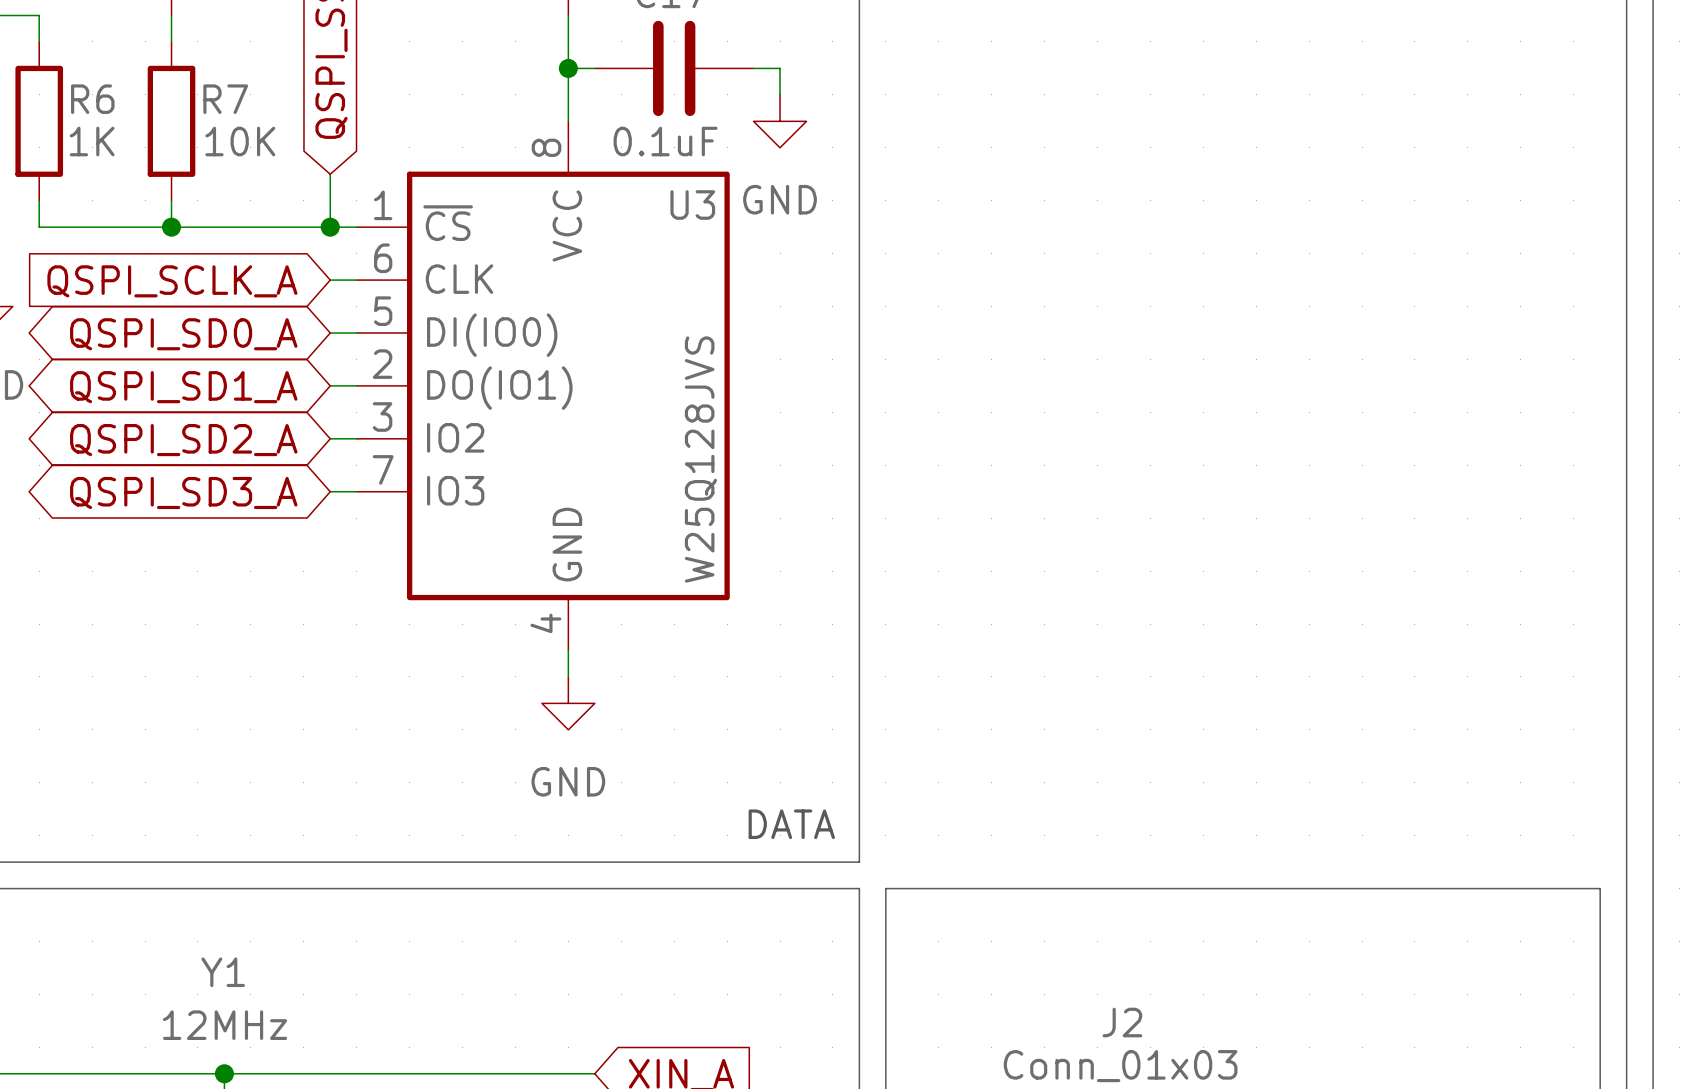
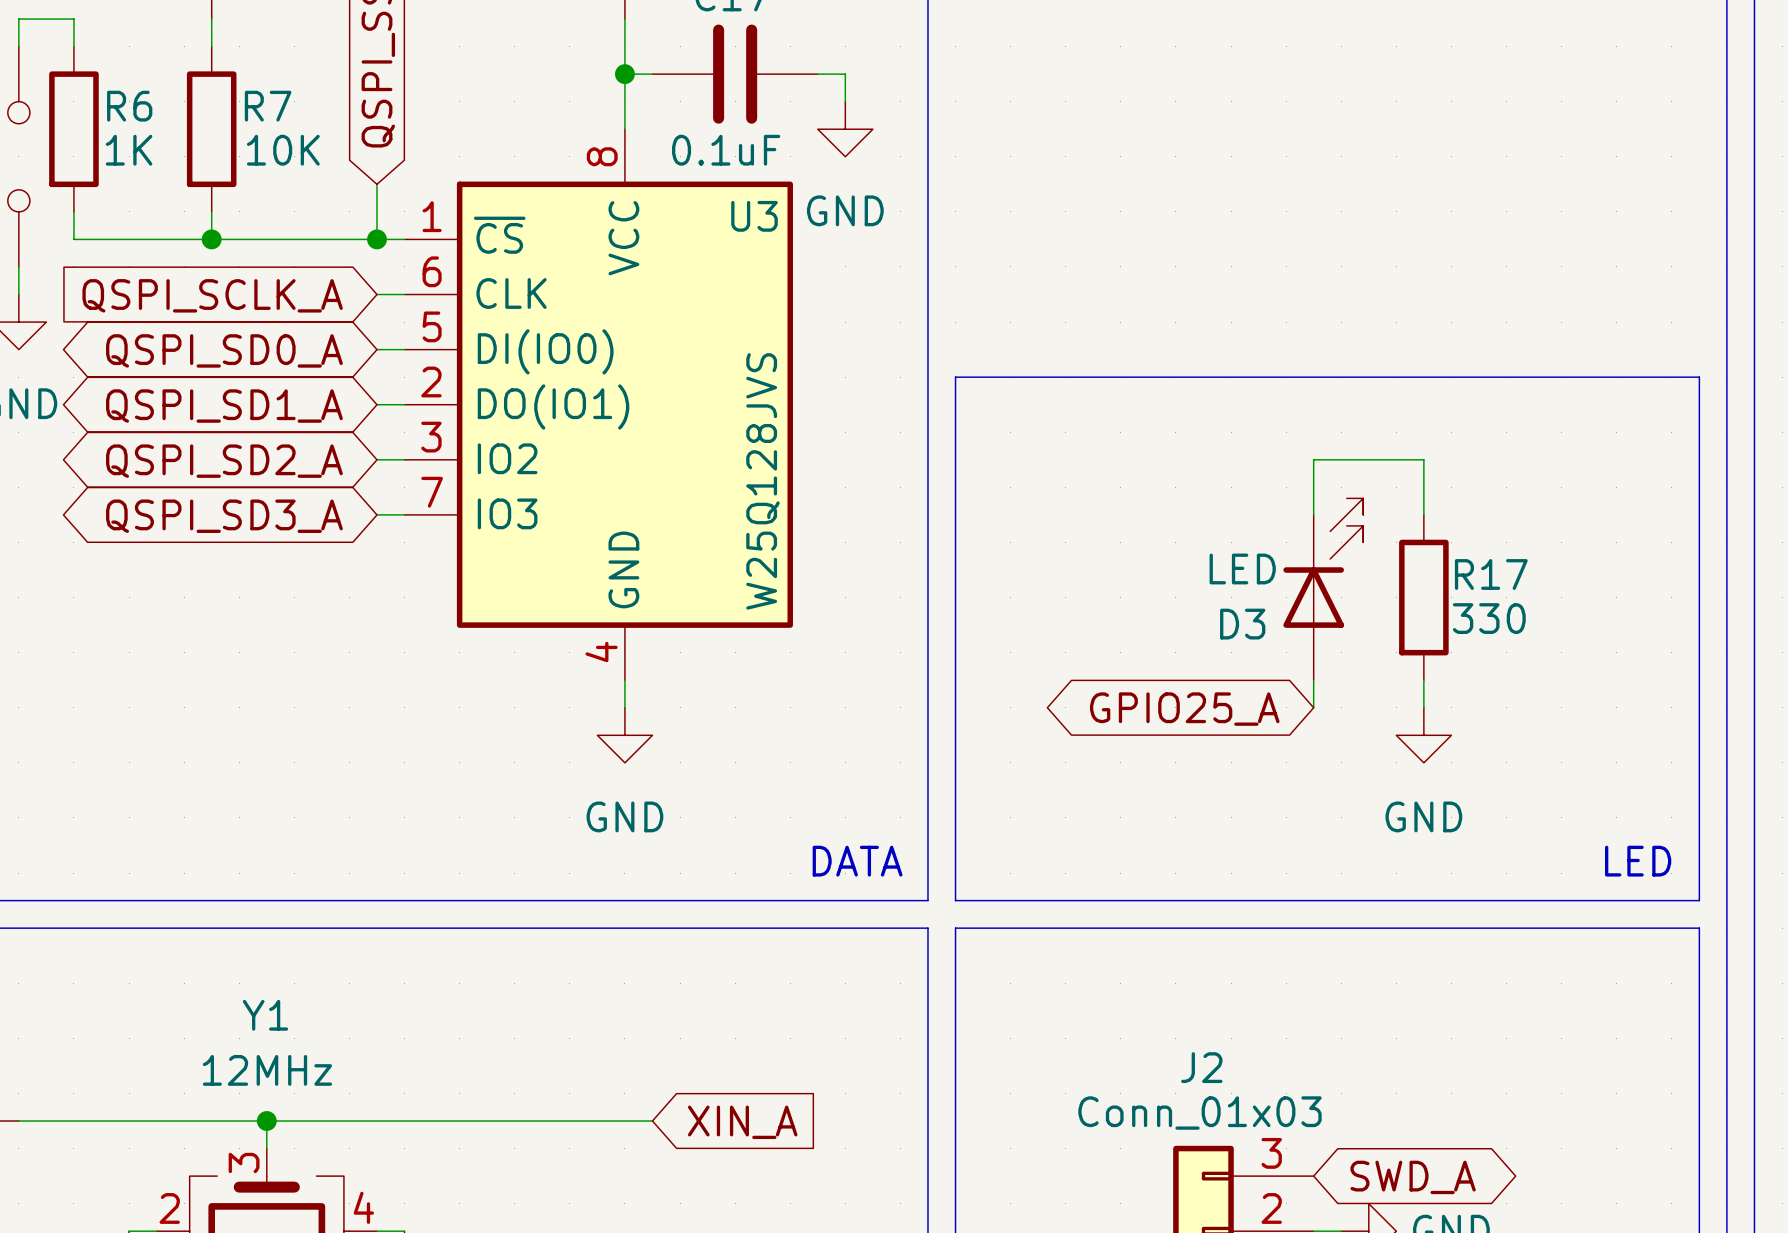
line: none -> (955, 377) (1699, 377) (1699, 900) (955, 900) (955, 377)
wire: none -> (1313, 514) (1313, 459) (1423, 459) (1423, 514)
D3: none -> LED (1323, 589)
R17: none -> 330 (1423, 597)
wire: none -> (1313, 680) (1313, 707)
wire: none -> (1423, 680) (1423, 707)
global label: none -> GPIO25_A (1184, 709)
power symbol: none -> GND (1423, 735)
text: none -> LED (1638, 861)

